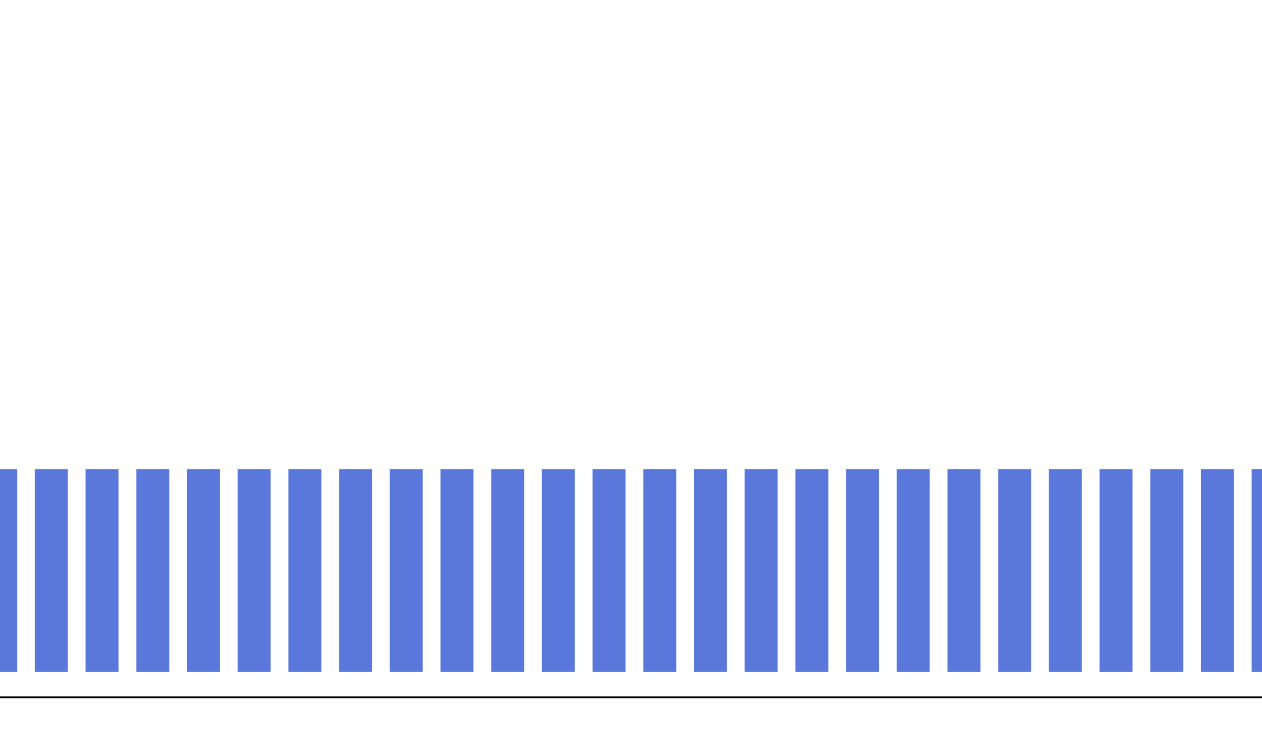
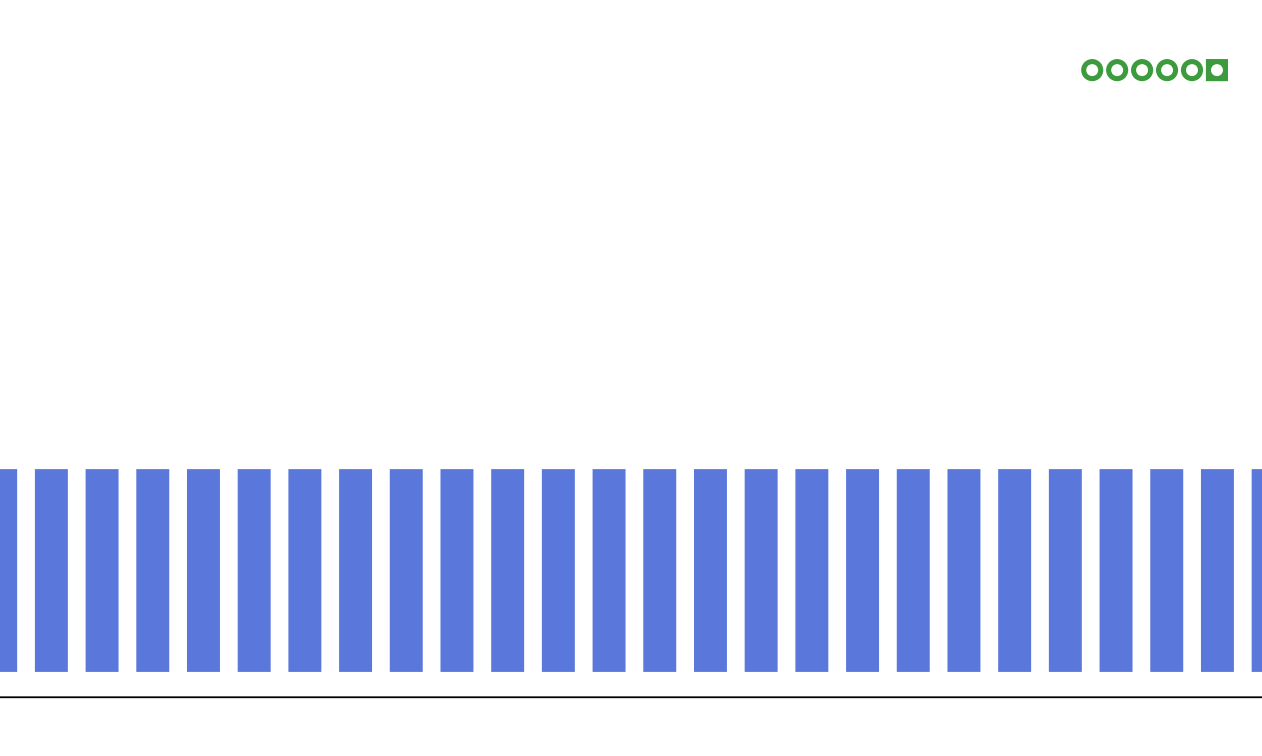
part: none -> (1154, 70)

